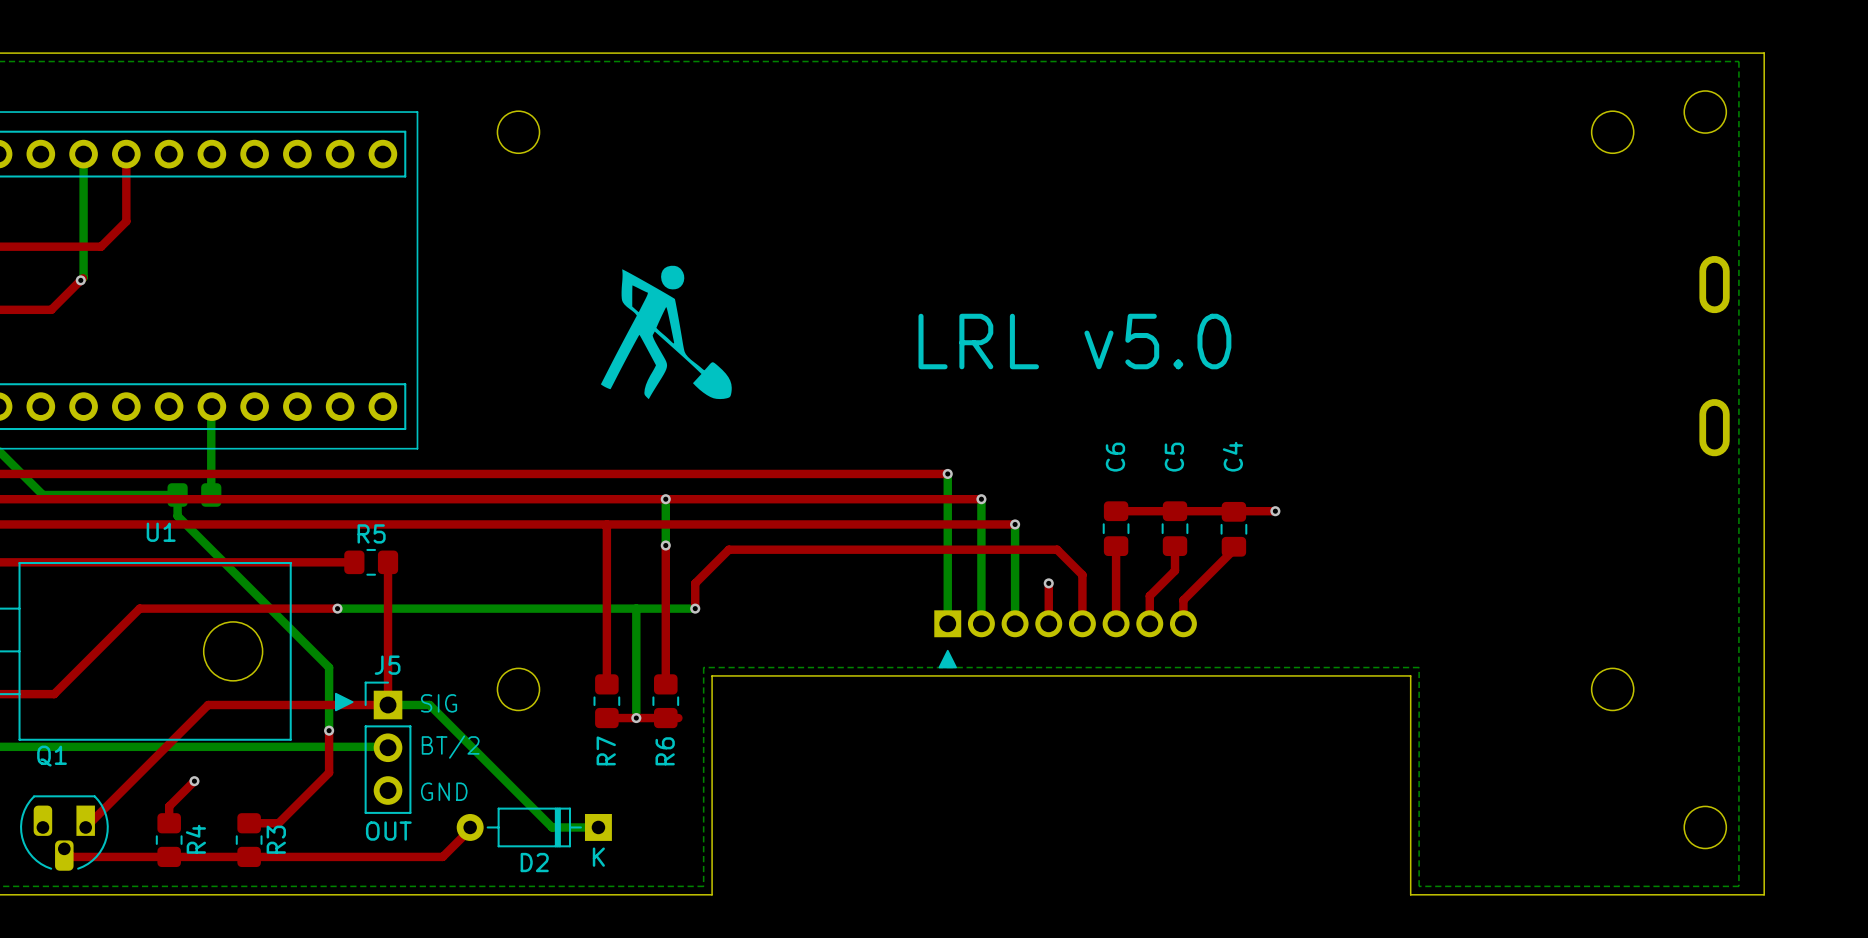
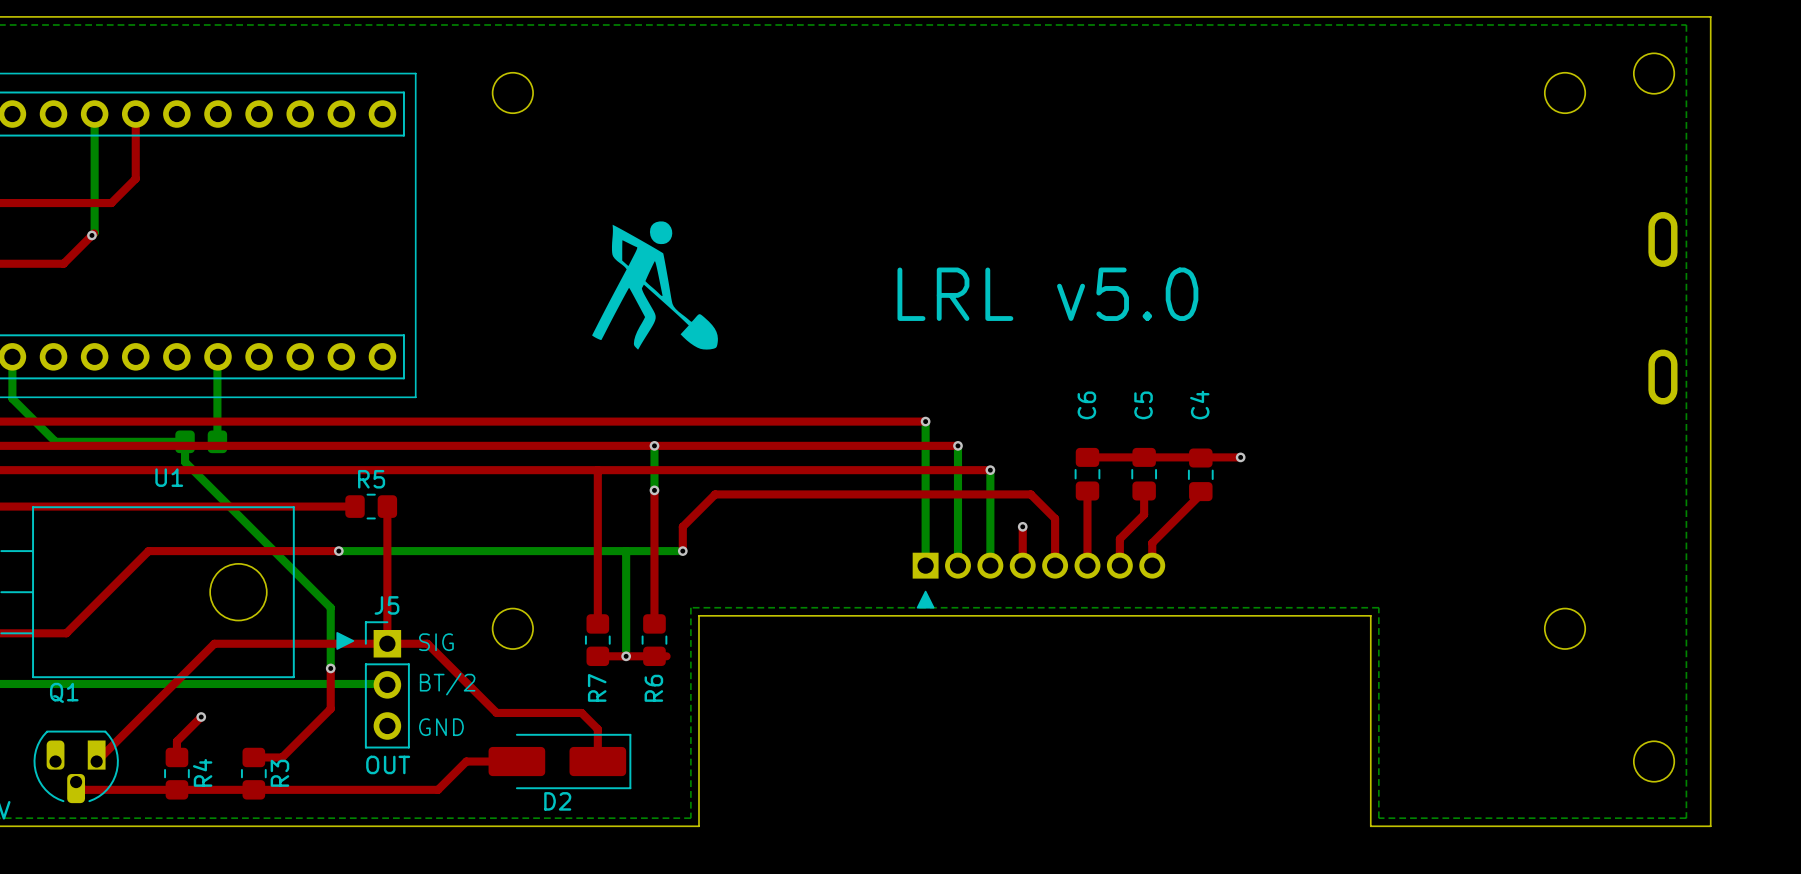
top track: none -> (387, 643) (427, 643) (496, 712) (581, 712) (597, 729) (597, 761)
bottom track: (388, 705) (429, 705) (552, 827) (598, 827) -> none
D2 footprint: [456, 807, 612, 848] -> [488, 733, 632, 790]
top track: (470, 827) (440, 856) -> (516, 761) (466, 761) (438, 789)

